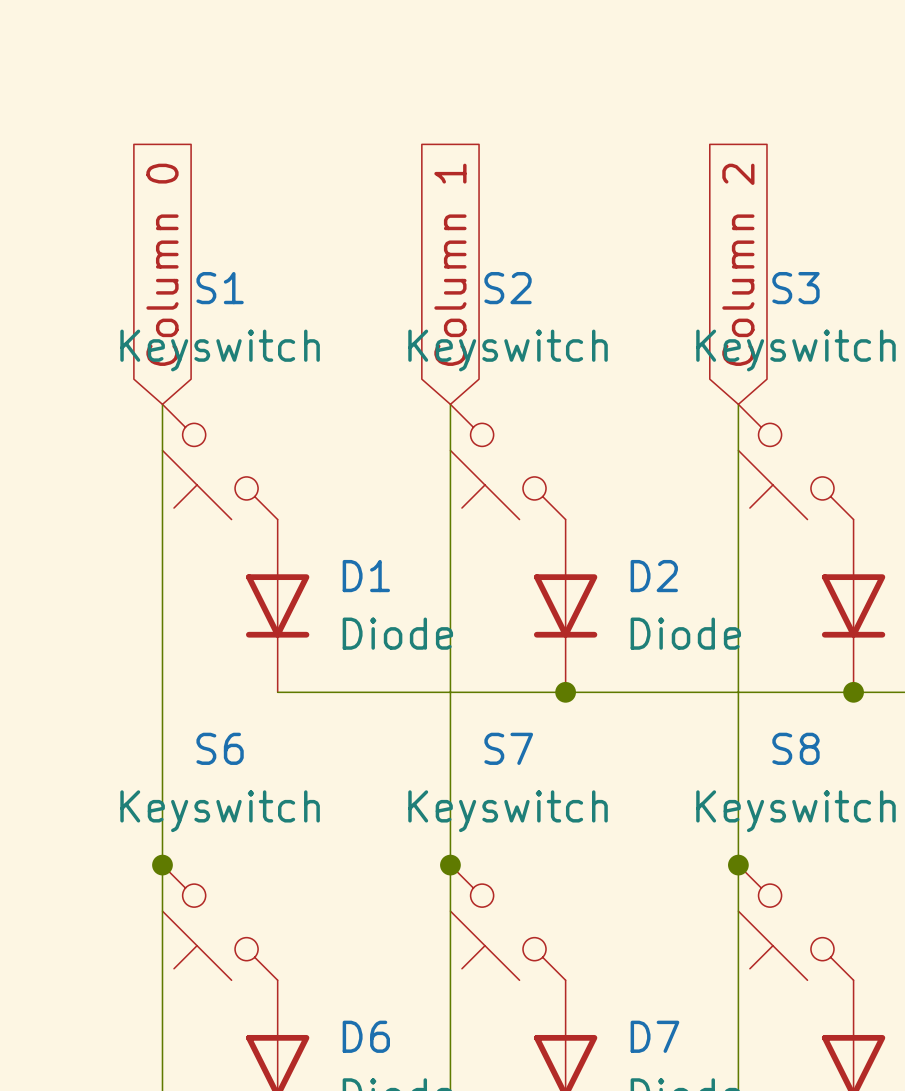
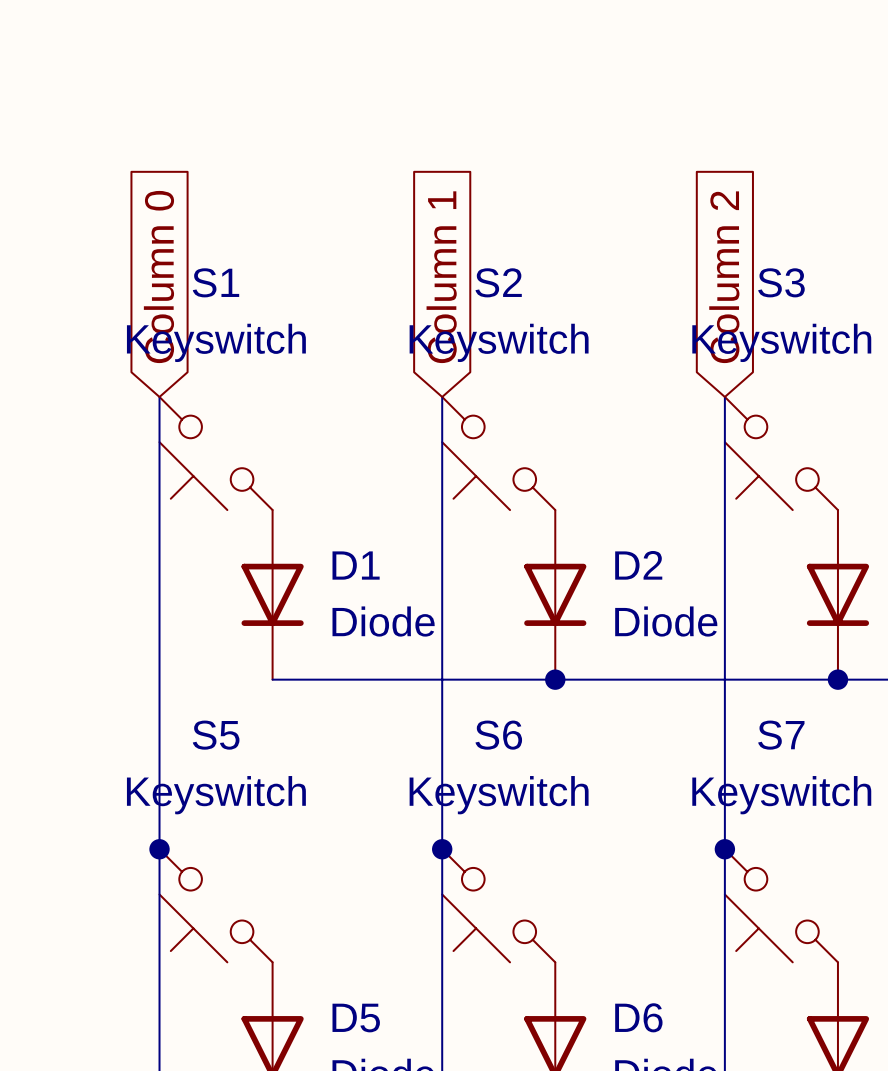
S6 name: S6 (220, 748) -> S5 (216, 735)
S7 name: S7 (508, 748) -> S6 (498, 735)
S8 name: S8 (795, 748) -> S7 (781, 735)
D6 name: D6 (366, 1036) -> D5 (356, 1018)
D7 name: D7 (654, 1036) -> D6 (638, 1017)

